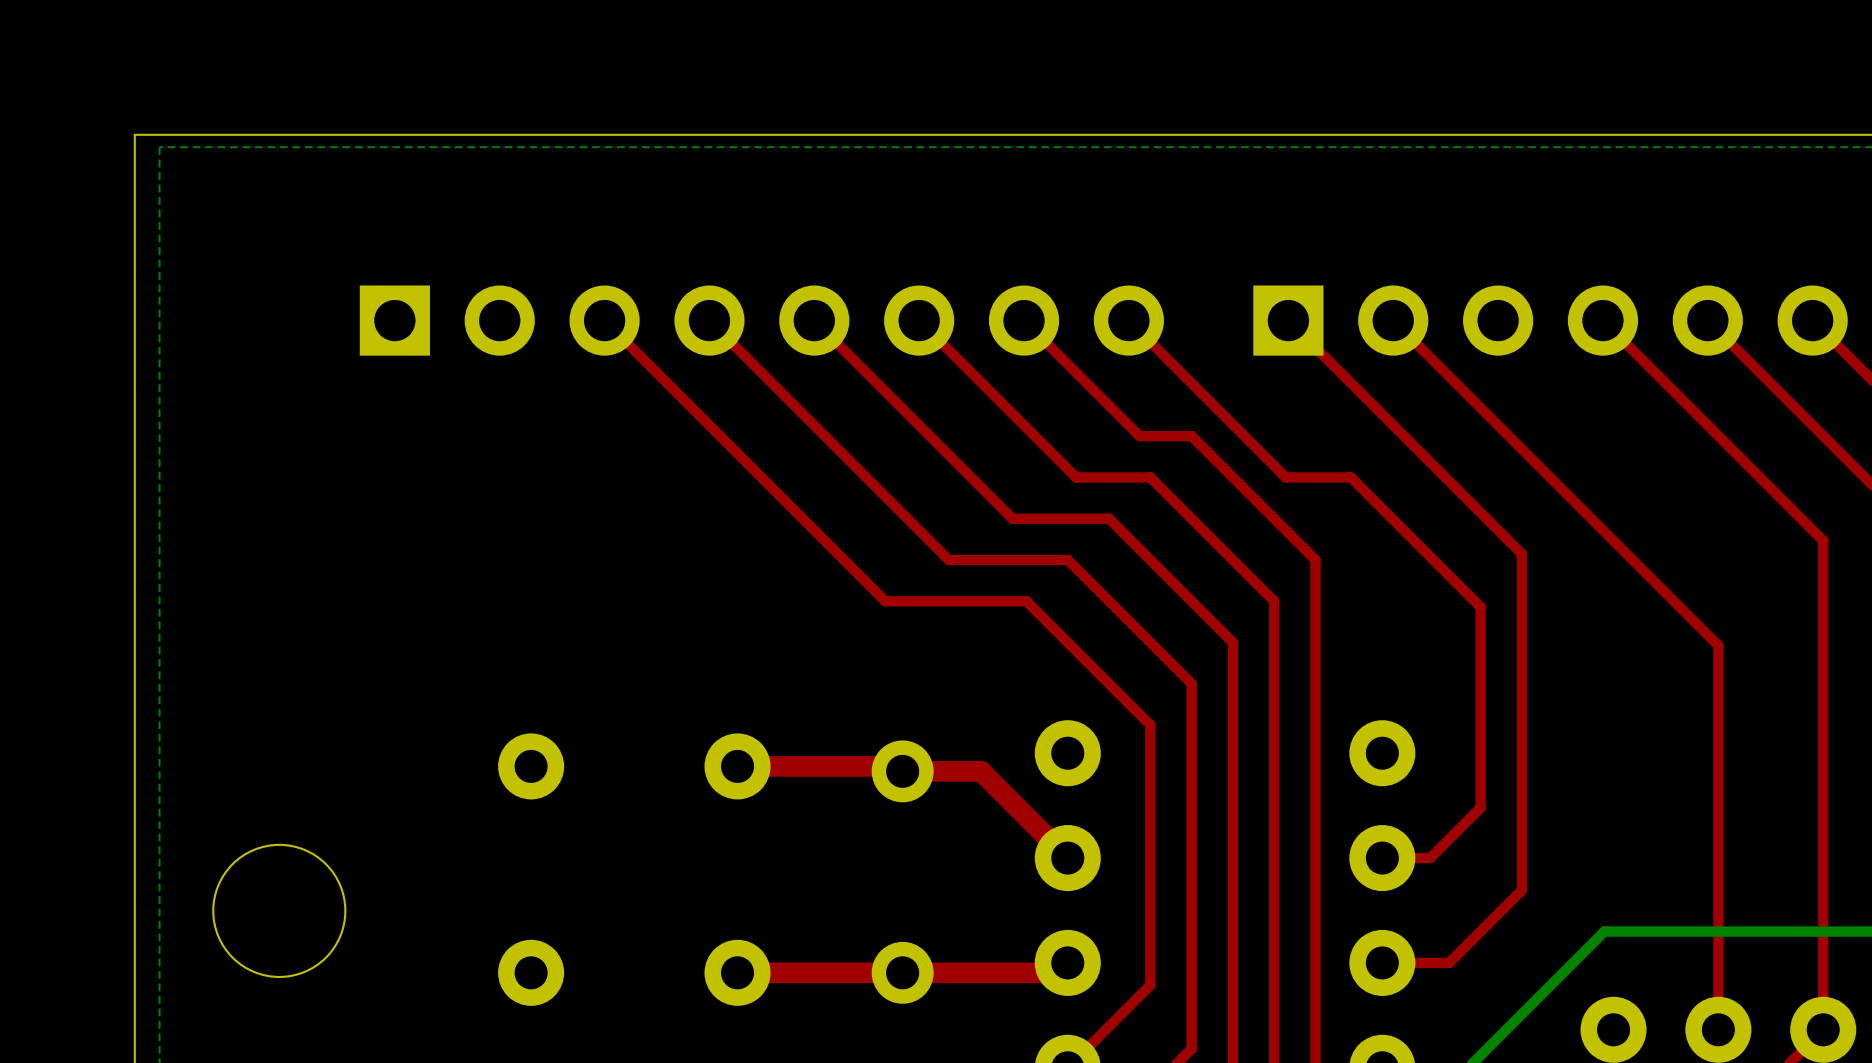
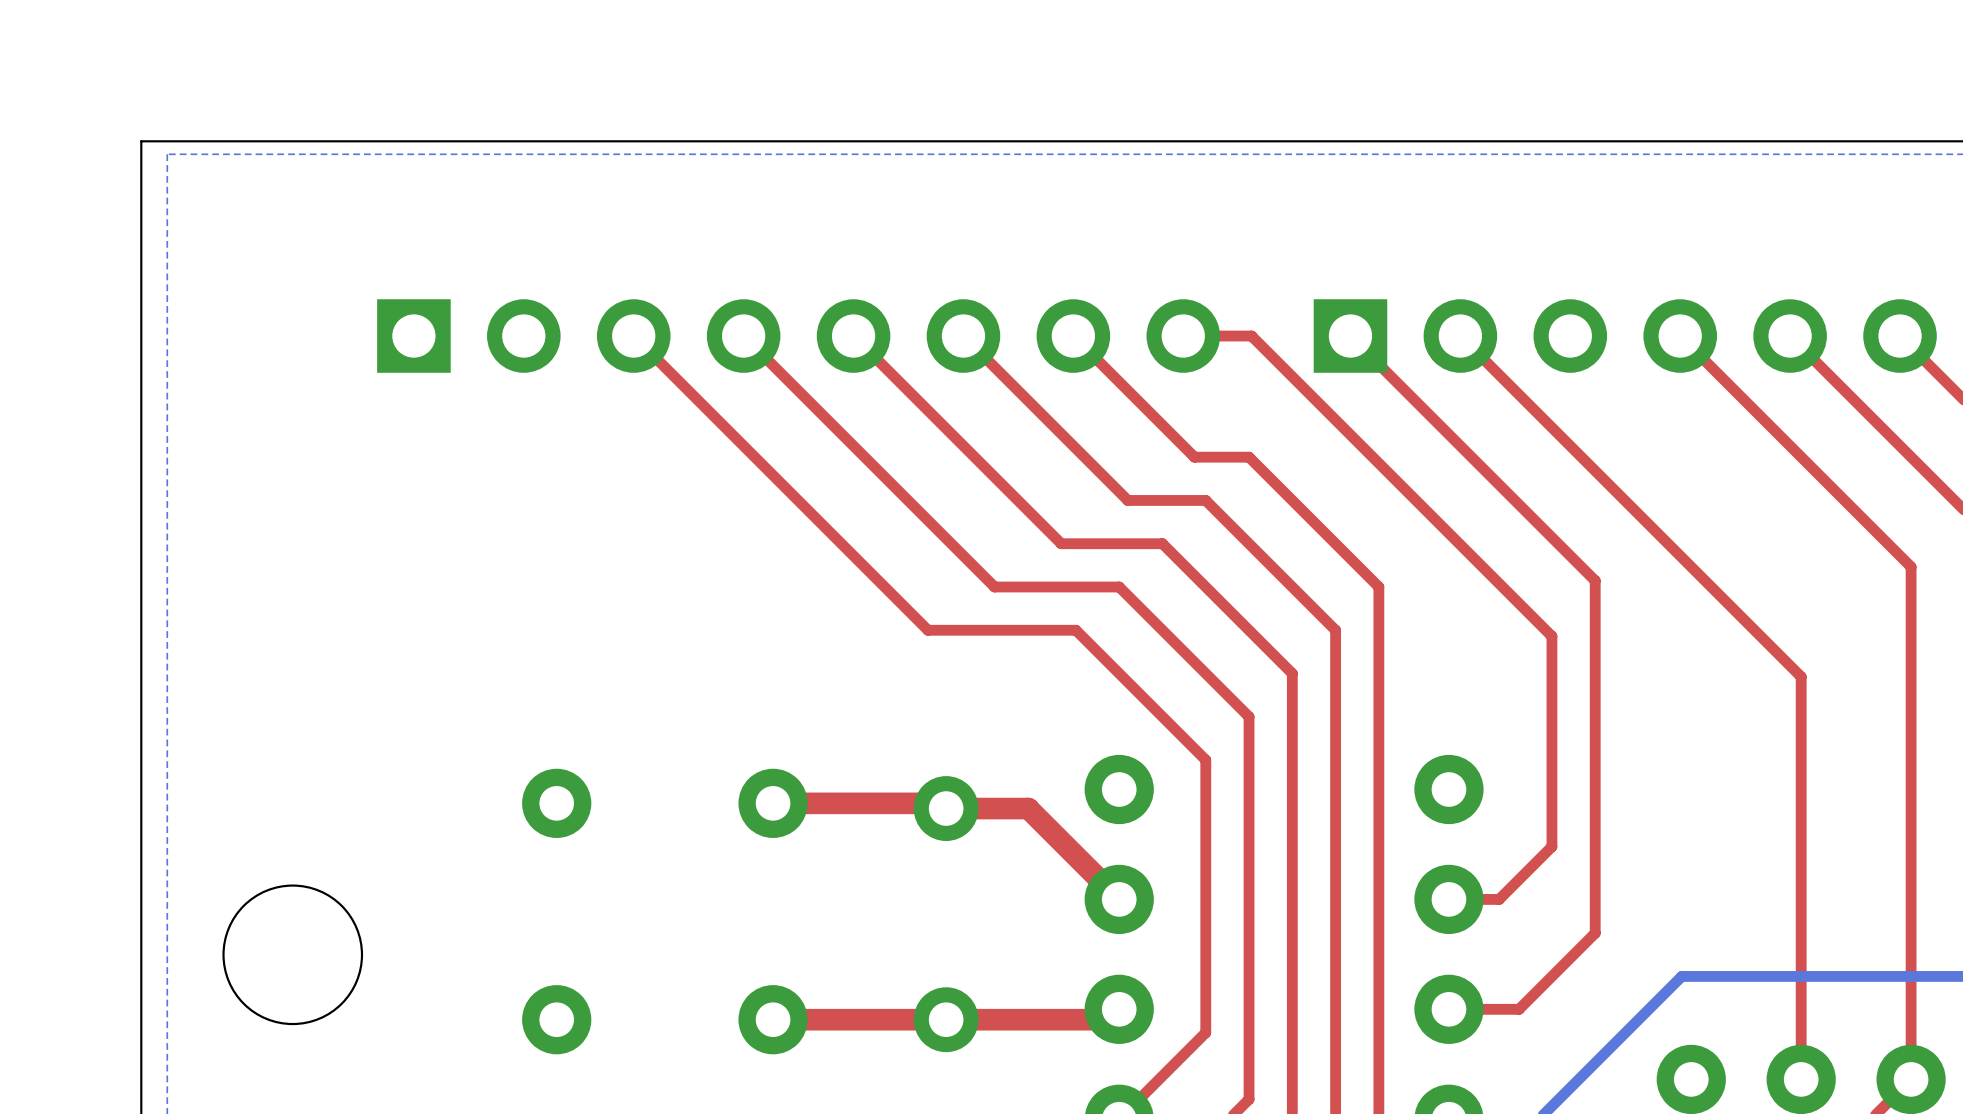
top track: (1128, 320) (1285, 477) (1350, 477) -> (1183, 336) (1251, 336) (1416, 500)

